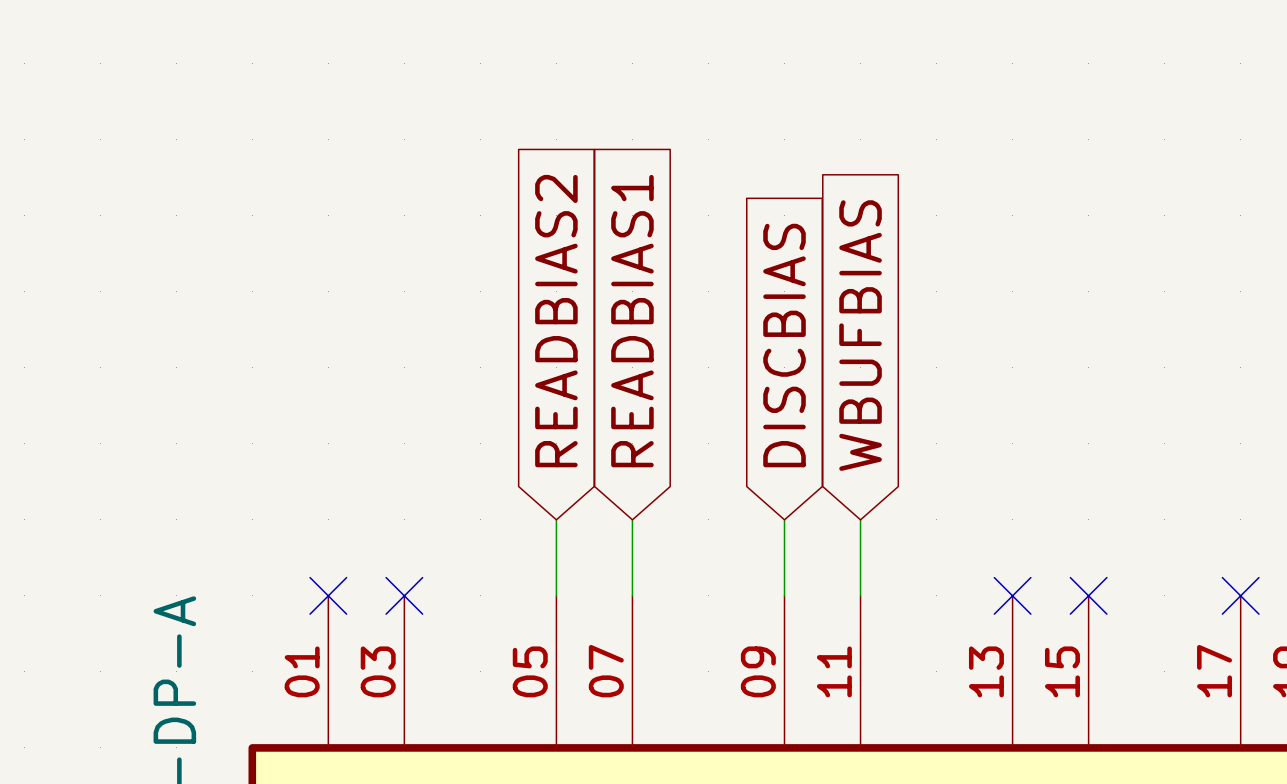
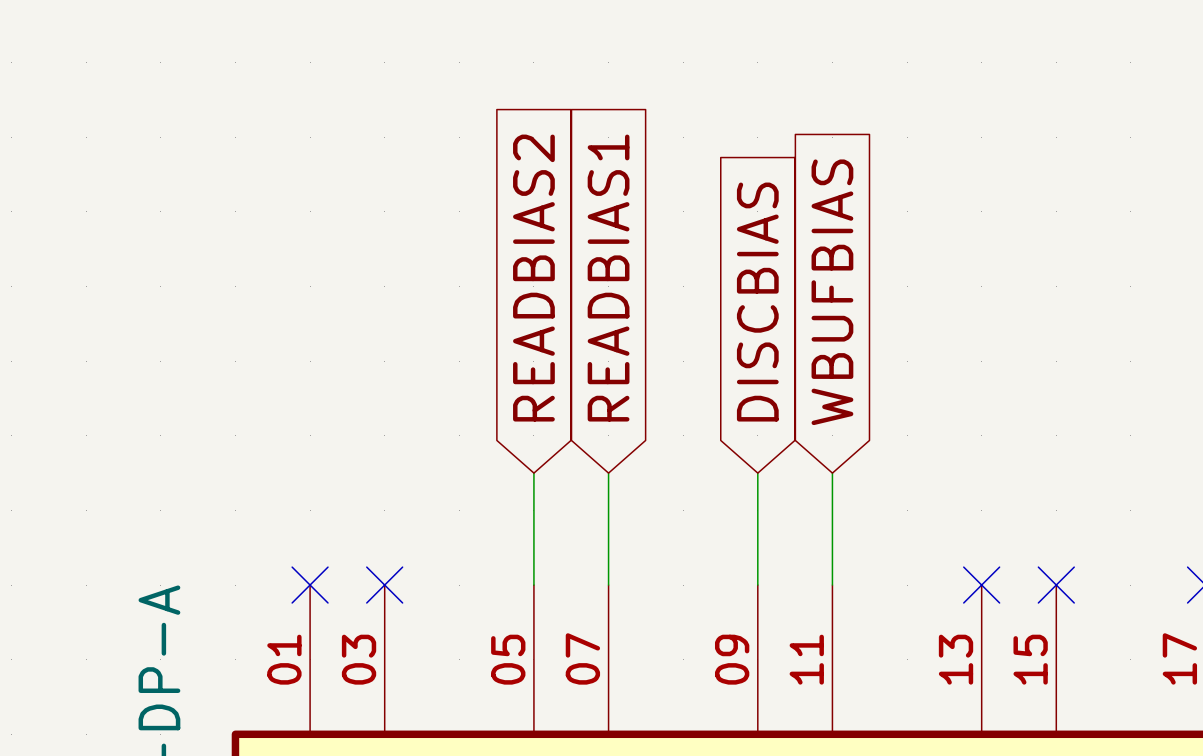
global label position: READBIAS2 (556, 321) -> READBIAS2 (533, 278)
global label position: READBIAS1 (632, 321) -> READBIAS1 (608, 278)
global label position: WBUFBIAS (860, 335) -> WBUFBIAS (832, 292)
global label position: DISCBIAS (784, 345) -> DISCBIAS (757, 302)
wire: none -> (533, 473) (533, 510)
wire: none -> (608, 473) (608, 510)
wire: none -> (757, 473) (757, 510)
wire: none -> (832, 473) (832, 510)

